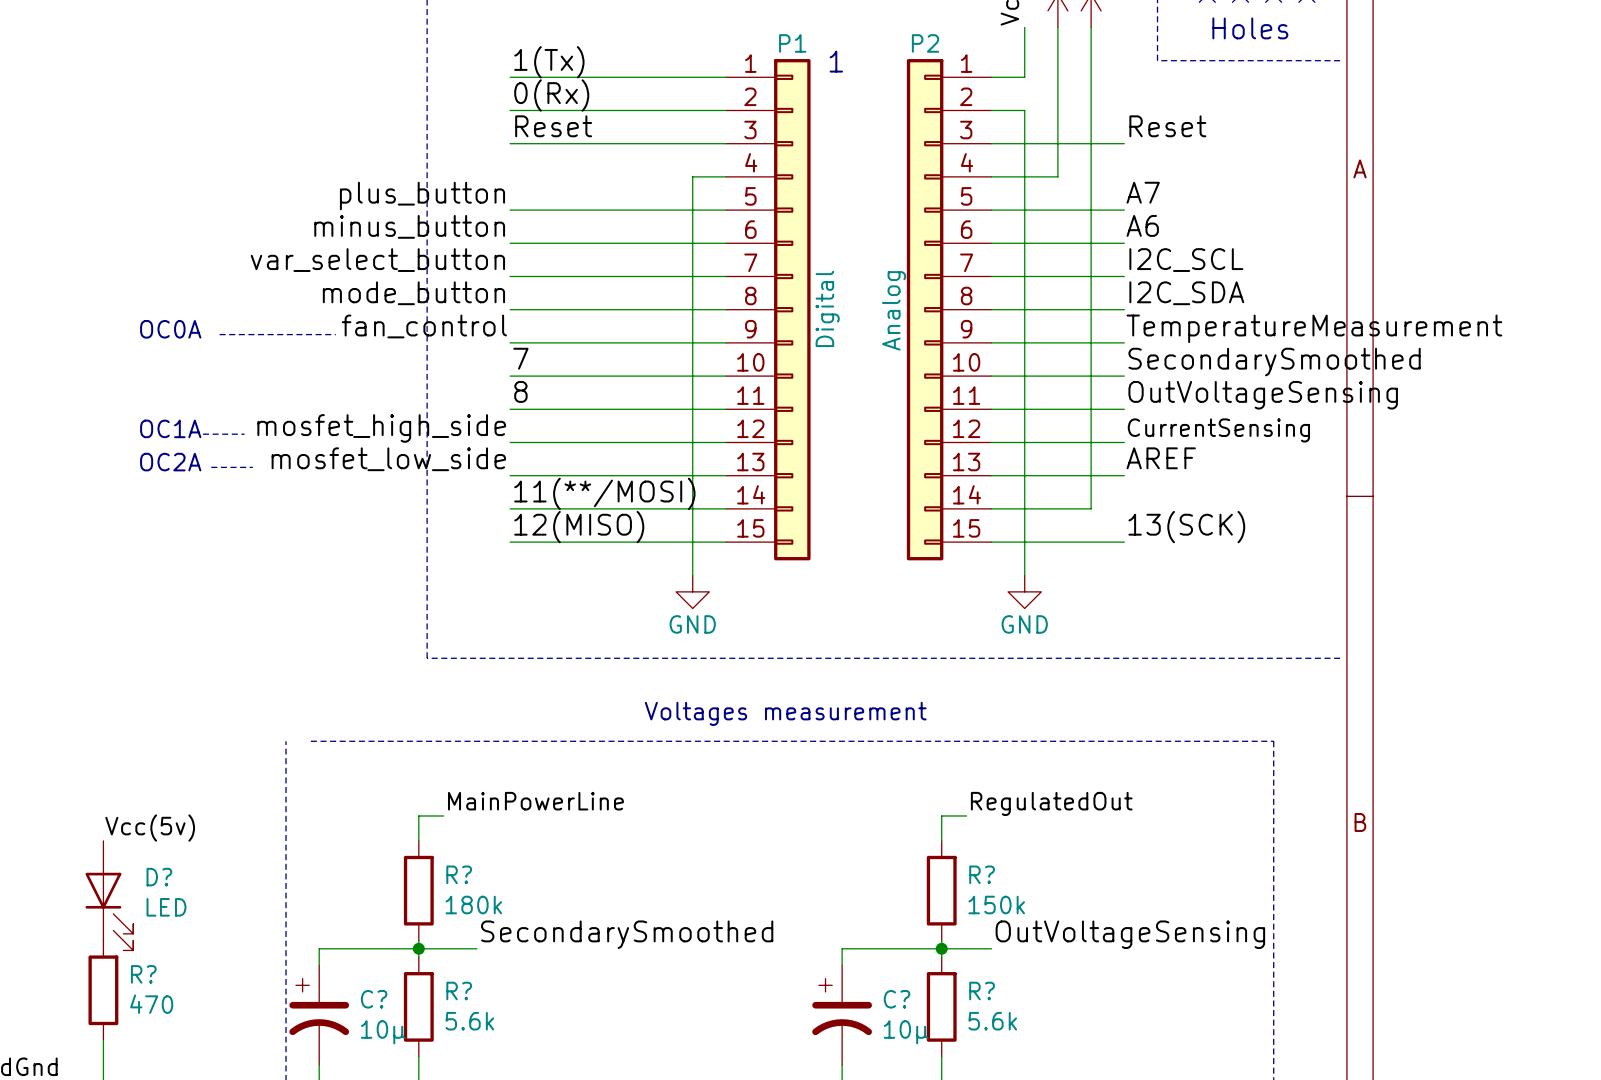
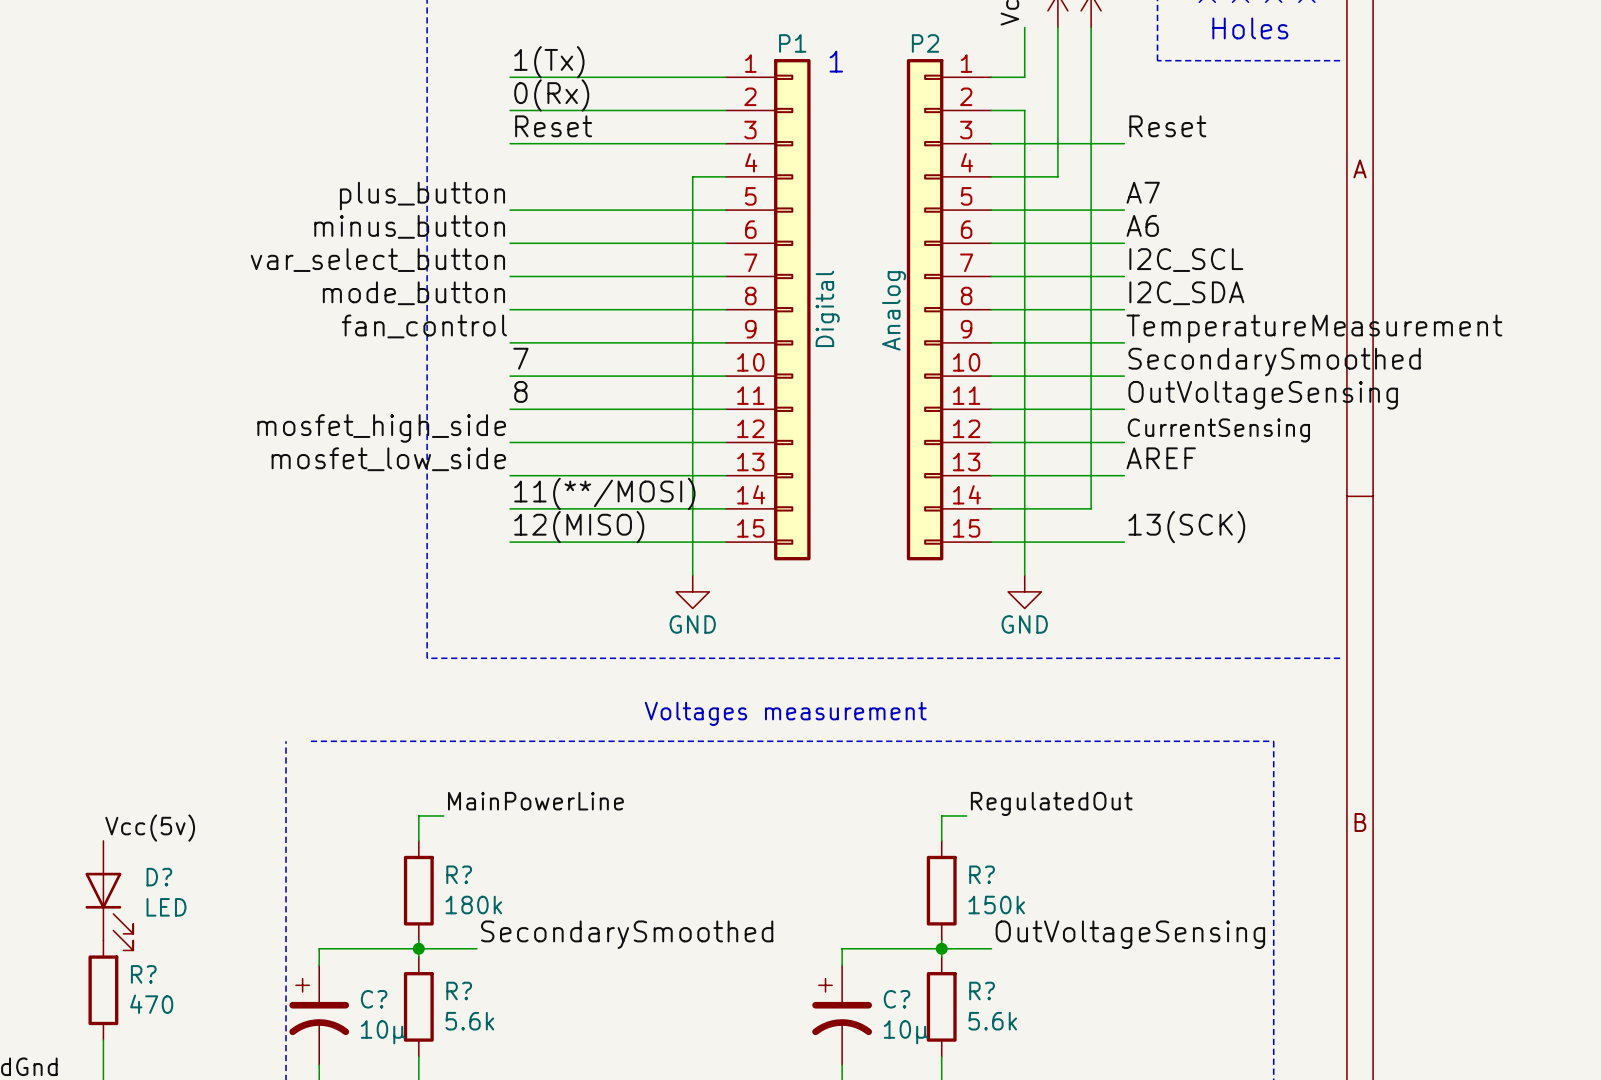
text: OC0A (170, 329) -> none
line: (219, 334) (335, 334) -> none
text: OC1A (170, 428) -> none
line: (203, 434) (244, 434) -> none
text: OC2A (170, 462) -> none
line: (211, 467) (252, 467) -> none

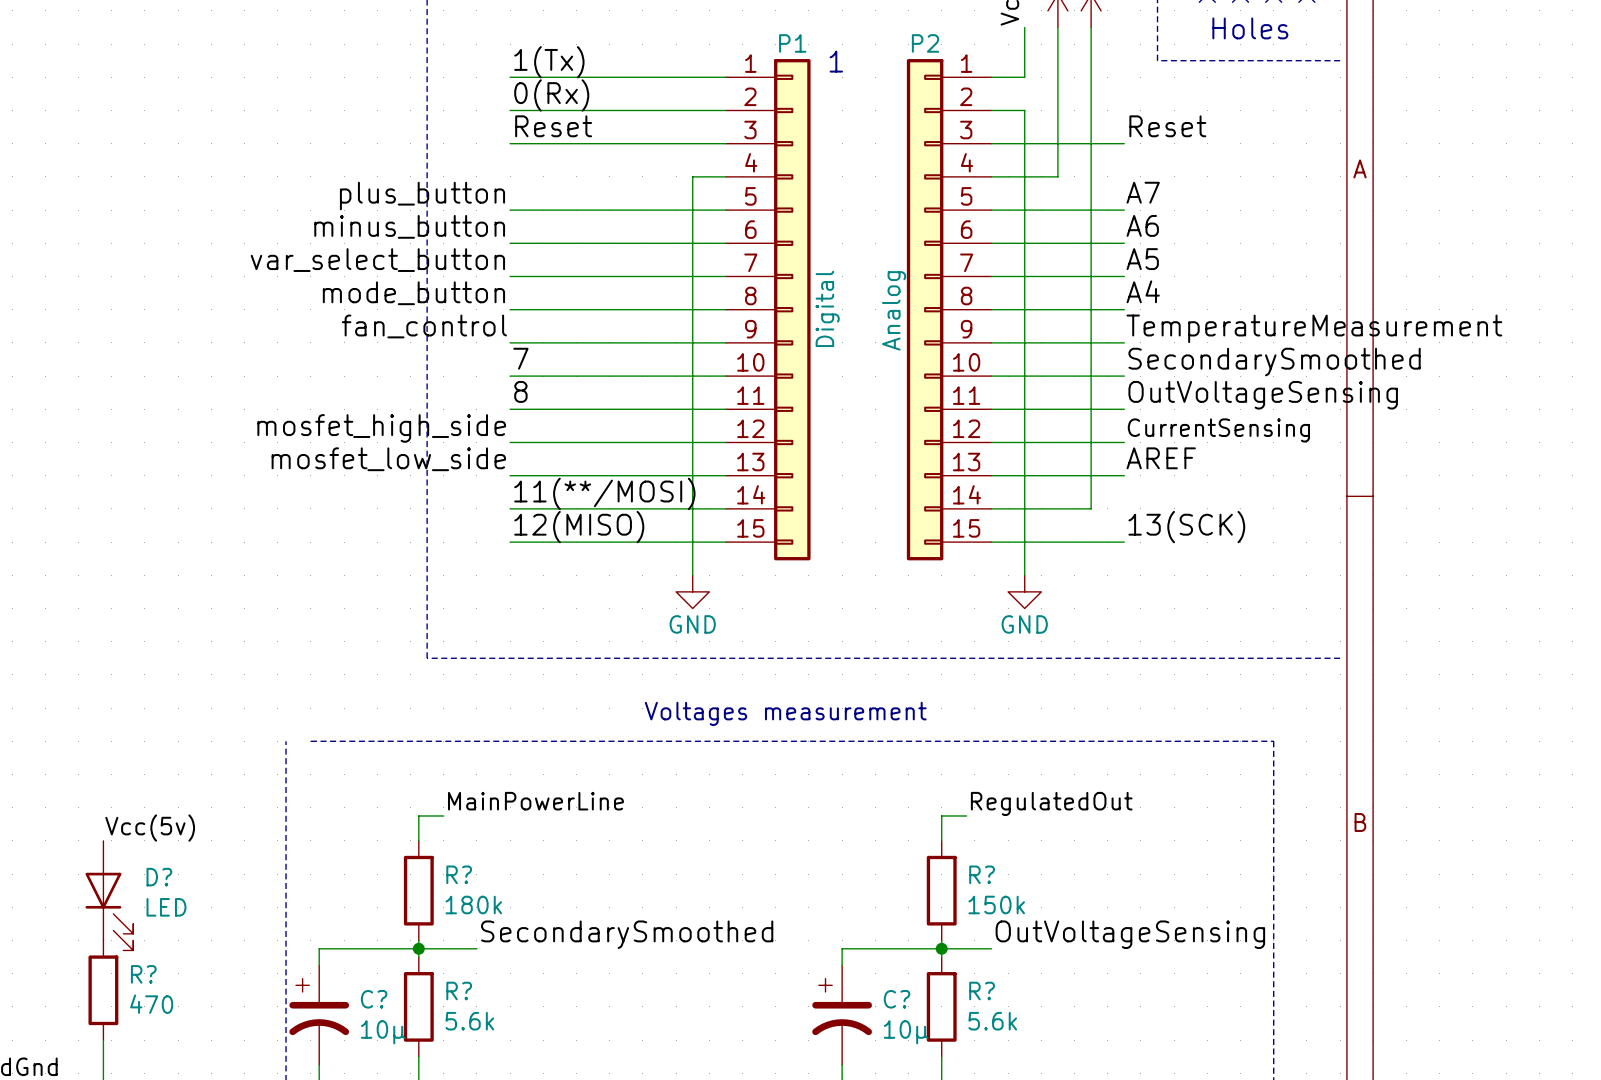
label: I2C_SCL (1186, 260) -> A5 (1142, 259)
label: I2C_SDA (1186, 293) -> A4 (1143, 291)

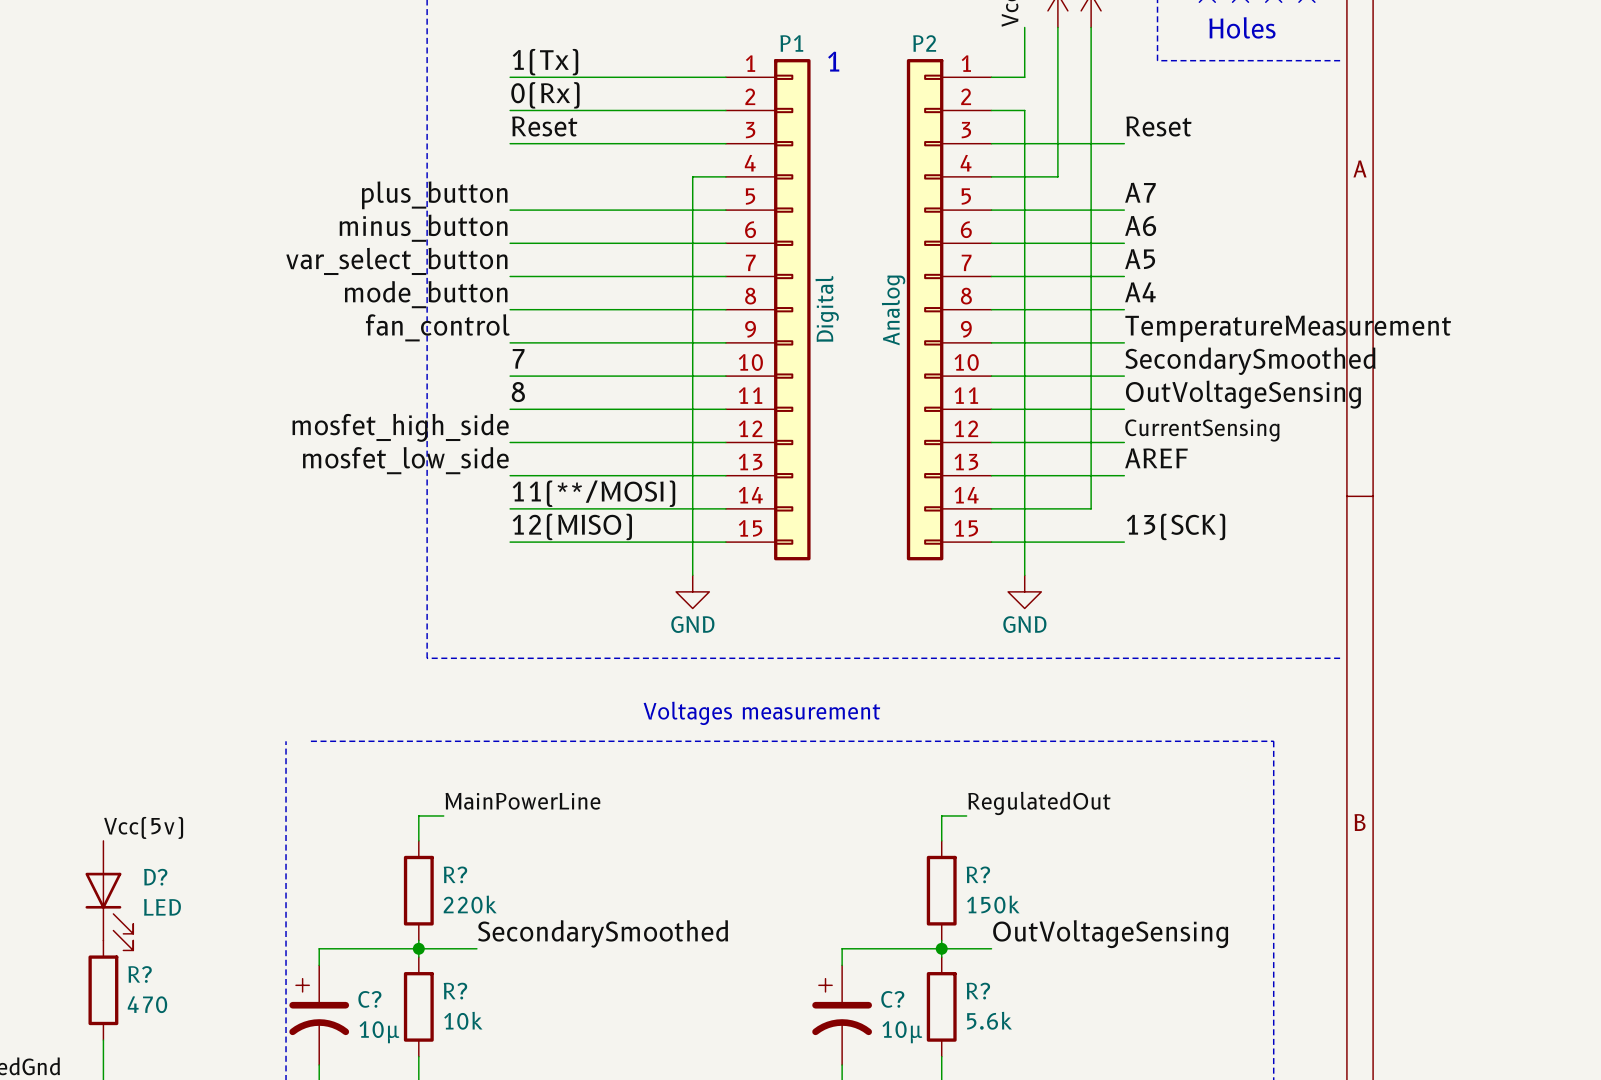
R? value: 180k (473, 905) -> 220k (470, 904)
R? value: 5.6k (469, 1021) -> 10k (463, 1020)

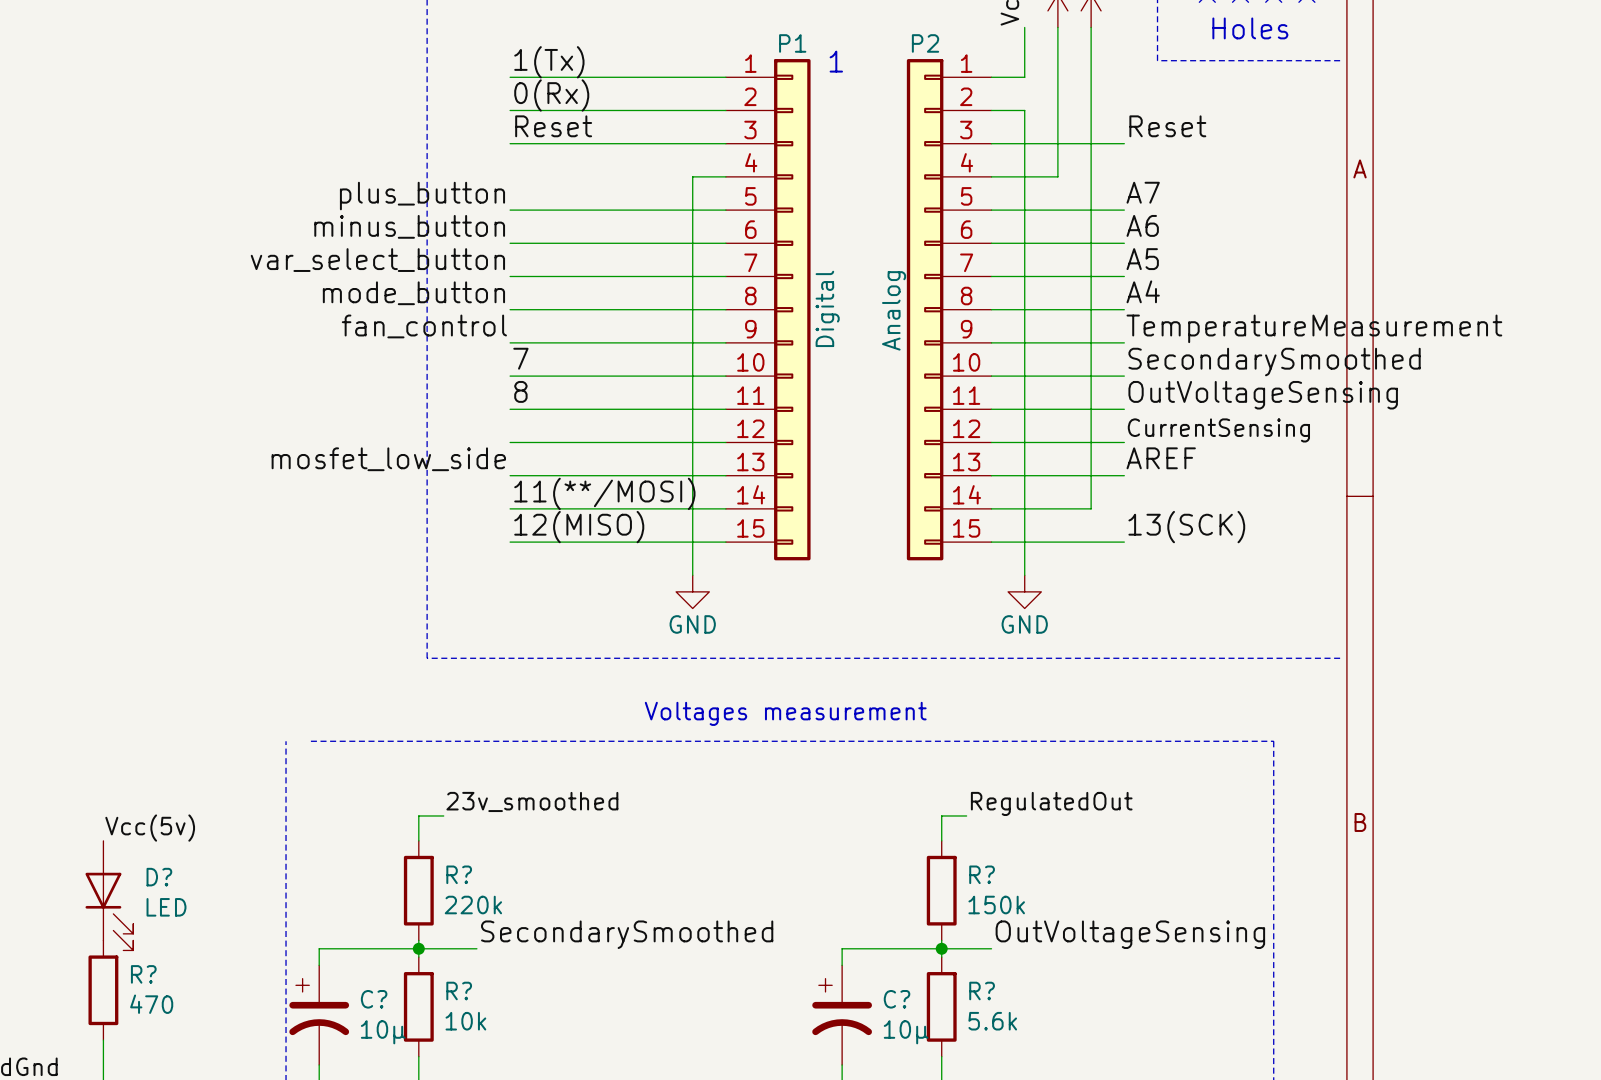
label: mosfet_high_side (400, 427) -> none
label: MainPowerLine (522, 801) -> 23v_smoothed (532, 801)

